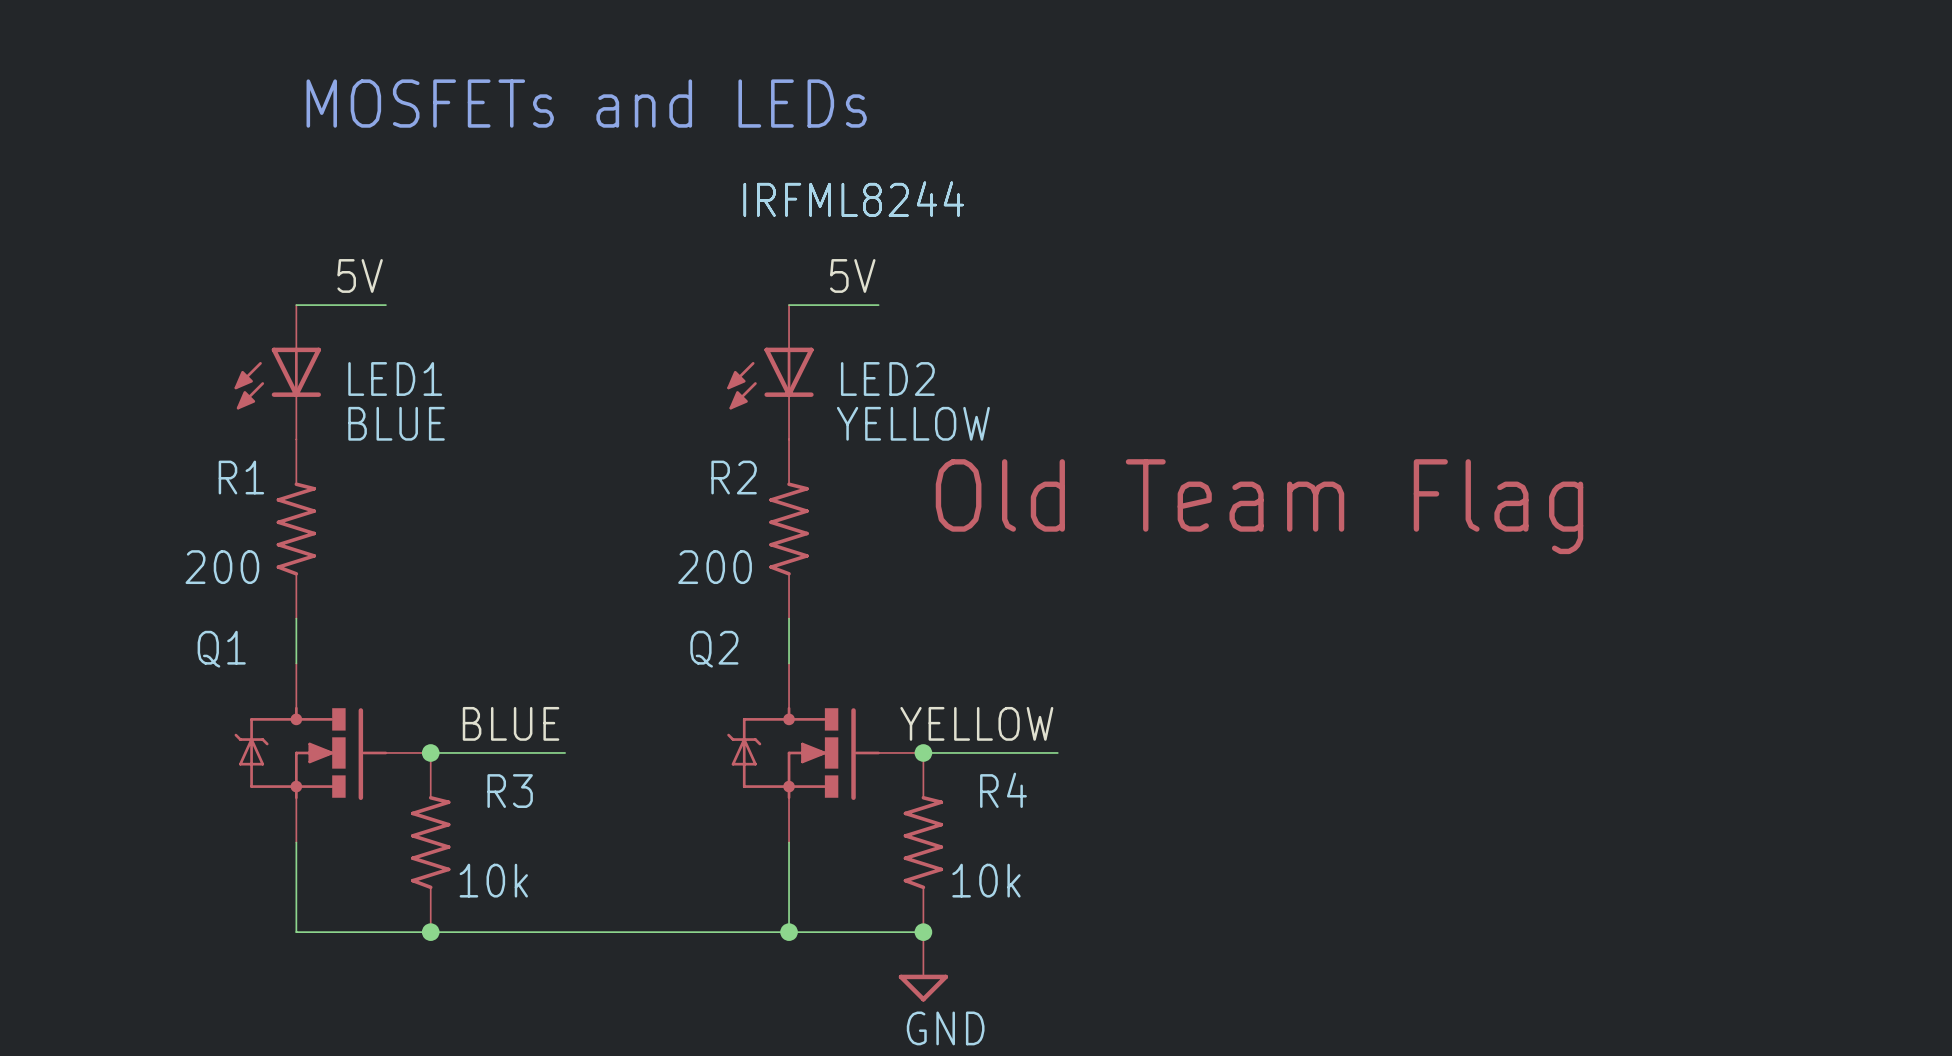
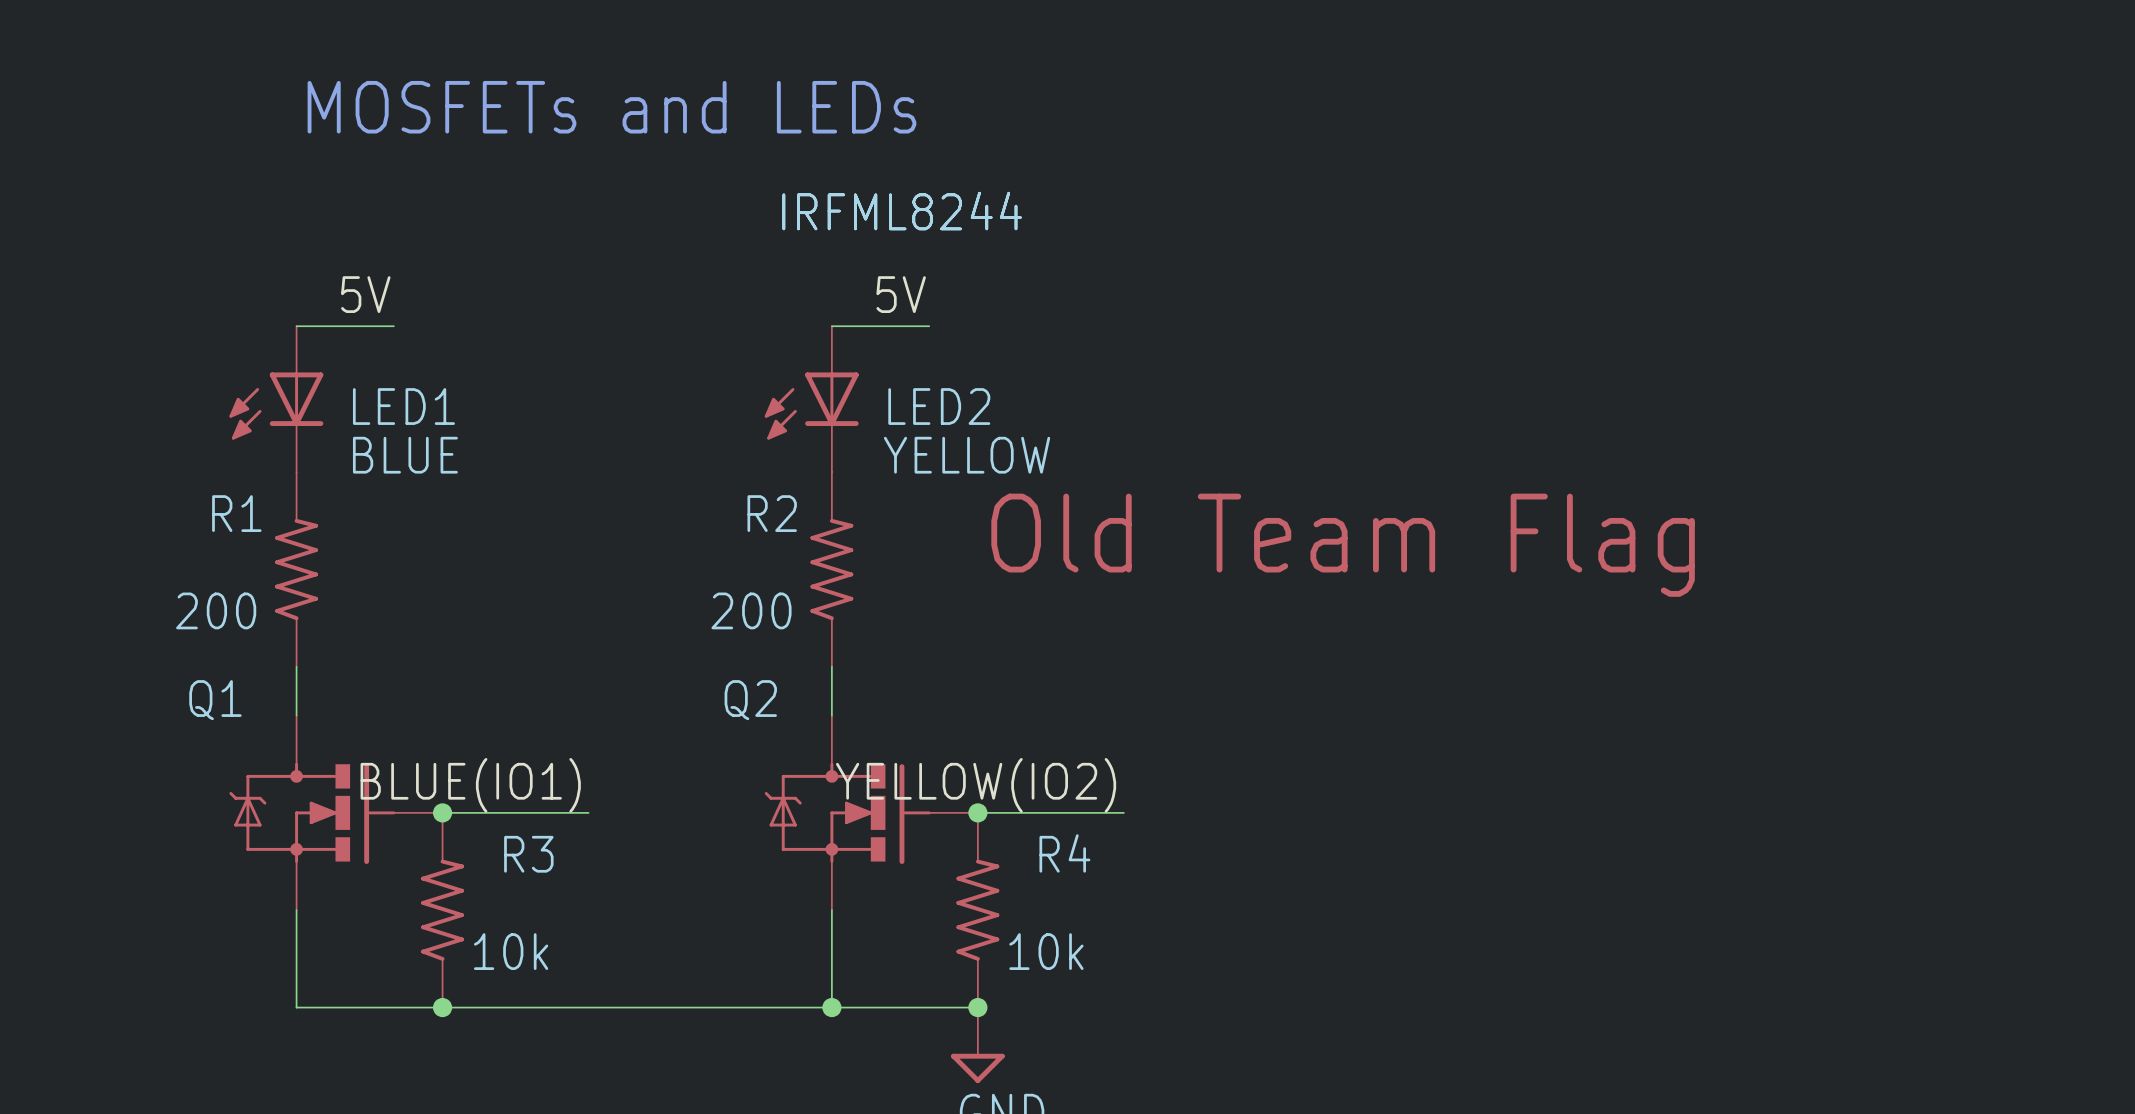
label: BLUE (511, 723) -> BLUE(IO1) (470, 785)
label: YELLOW (976, 723) -> YELLOW(IO2) (976, 785)

